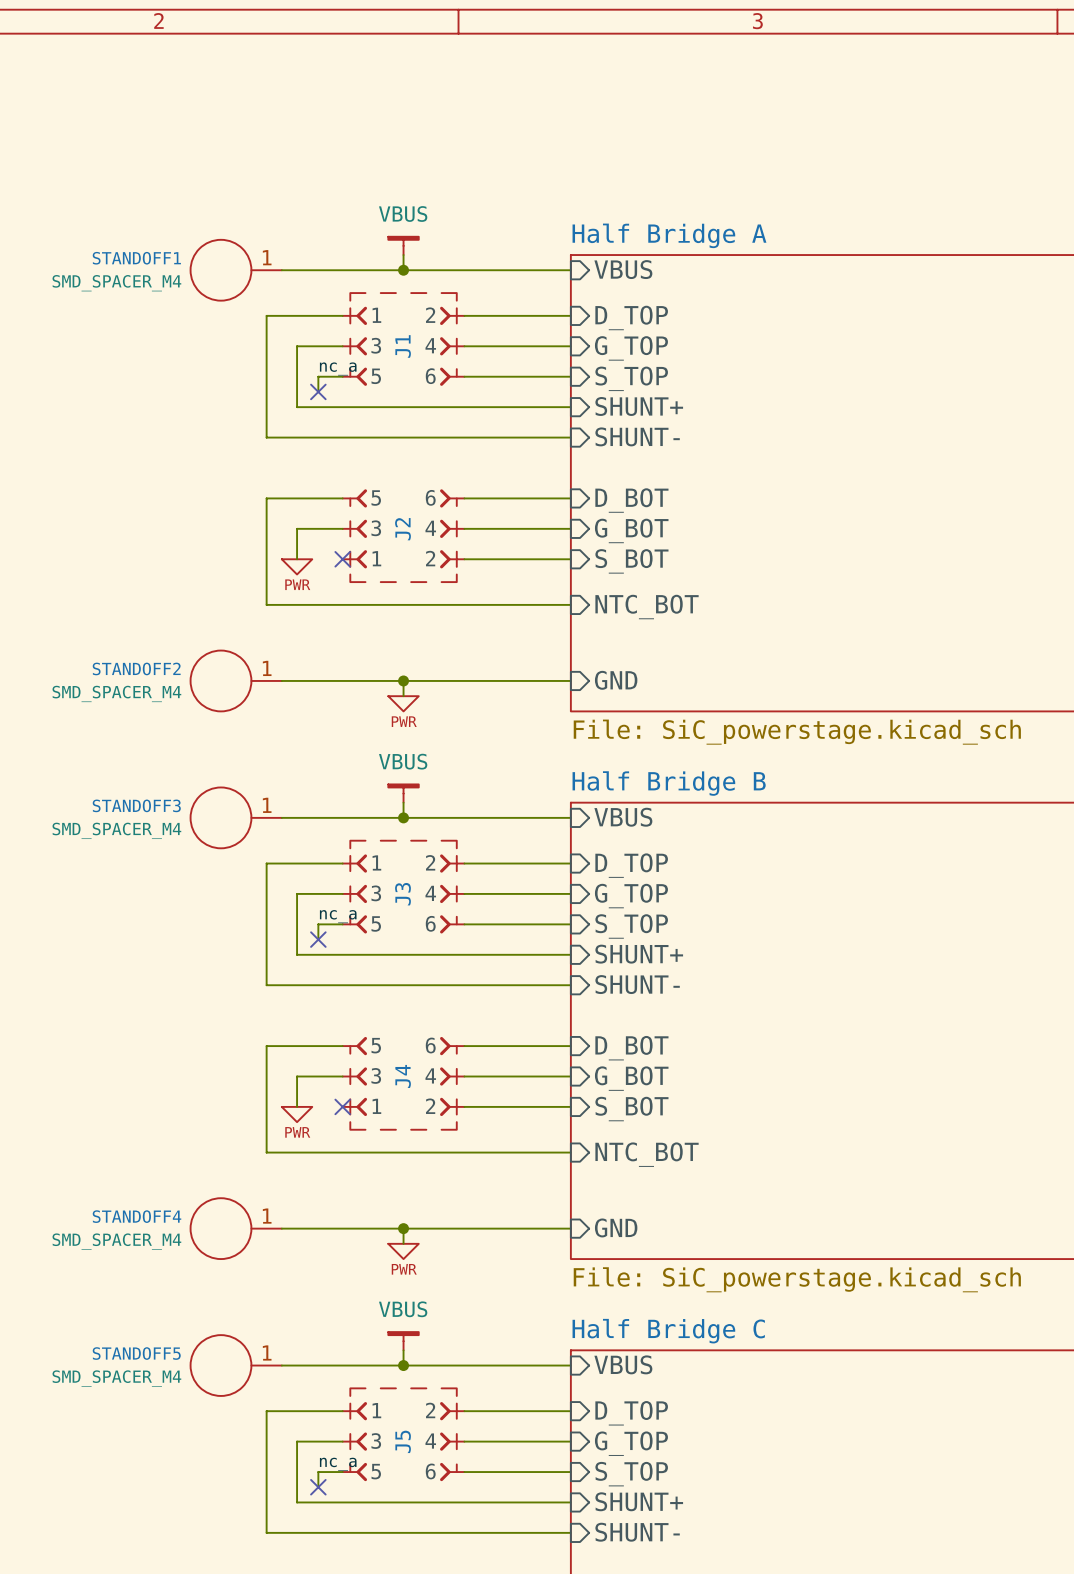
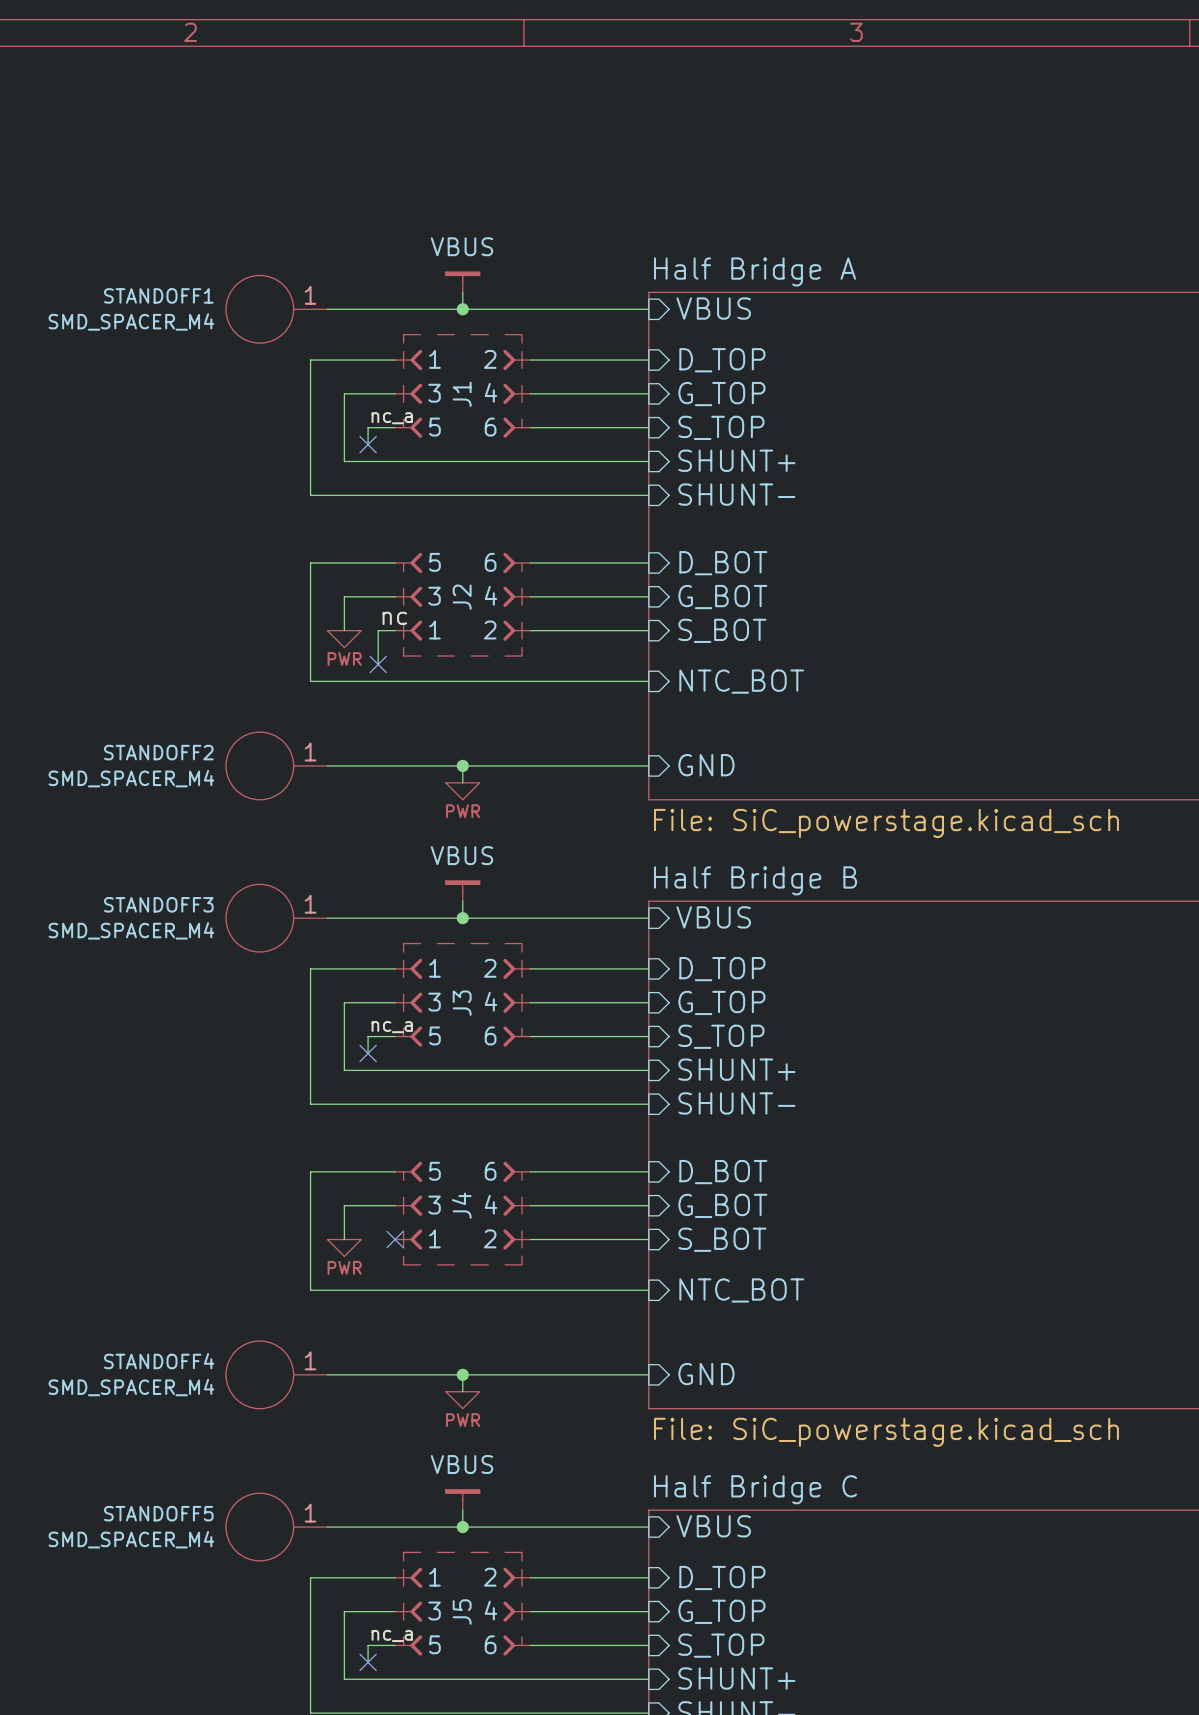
label: none -> nc (394, 618)
wire: none -> (395, 630) (378, 630) (378, 664)
no-connect mark position: (342, 559) -> (378, 664)

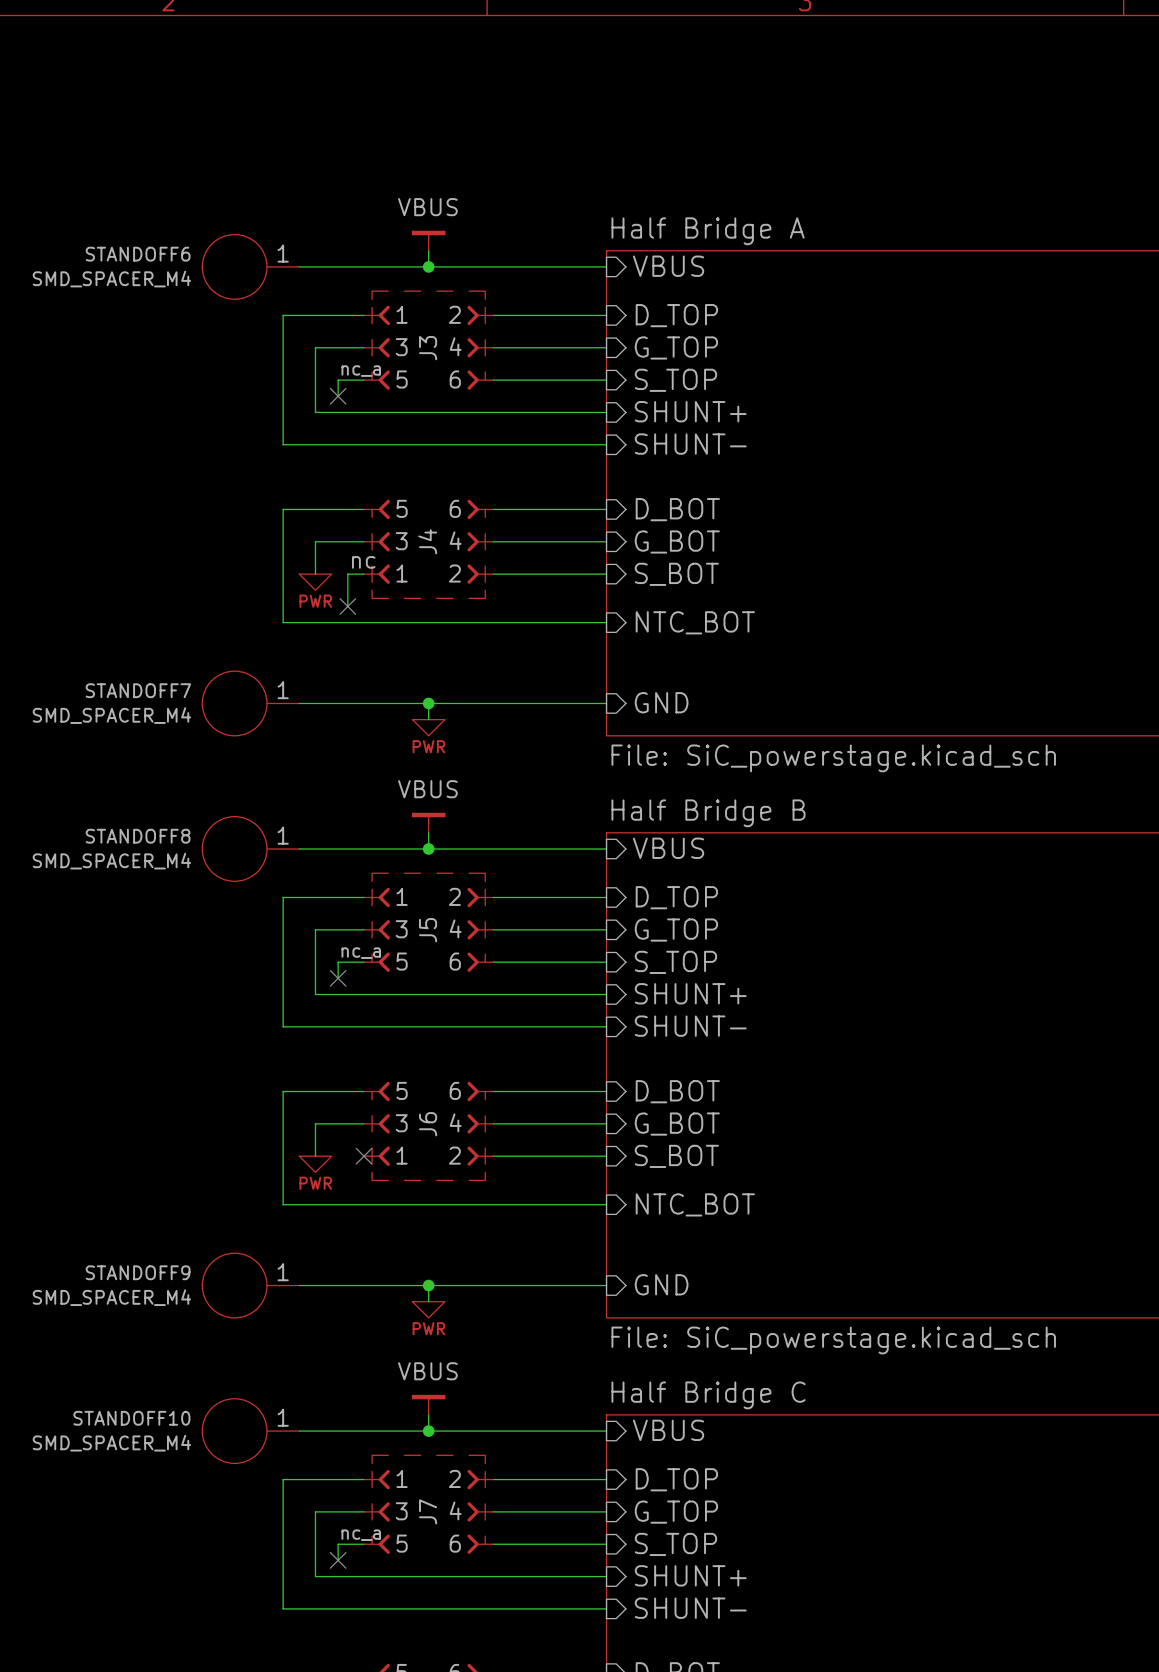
STANDOFF1 name: STANDOFF1 (158, 295) -> STANDOFF6 (138, 254)
J1 name: J1 (462, 394) -> J3 (428, 348)
J2 name: J2 (462, 597) -> J4 (427, 541)
STANDOFF2 name: STANDOFF2 (158, 752) -> STANDOFF7 (138, 690)
STANDOFF3 name: STANDOFF3 (158, 904) -> STANDOFF8 (138, 836)
J3 name: J3 (462, 1003) -> J5 (428, 930)
J4 name: J4 (461, 1205) -> J6 (428, 1124)
STANDOFF4 name: STANDOFF4 (159, 1361) -> STANDOFF9 (138, 1272)
STANDOFF5 name: STANDOFF5 (158, 1513) -> STANDOFF10 (131, 1418)
J5 name: J5 (462, 1612) -> J7 (428, 1511)

